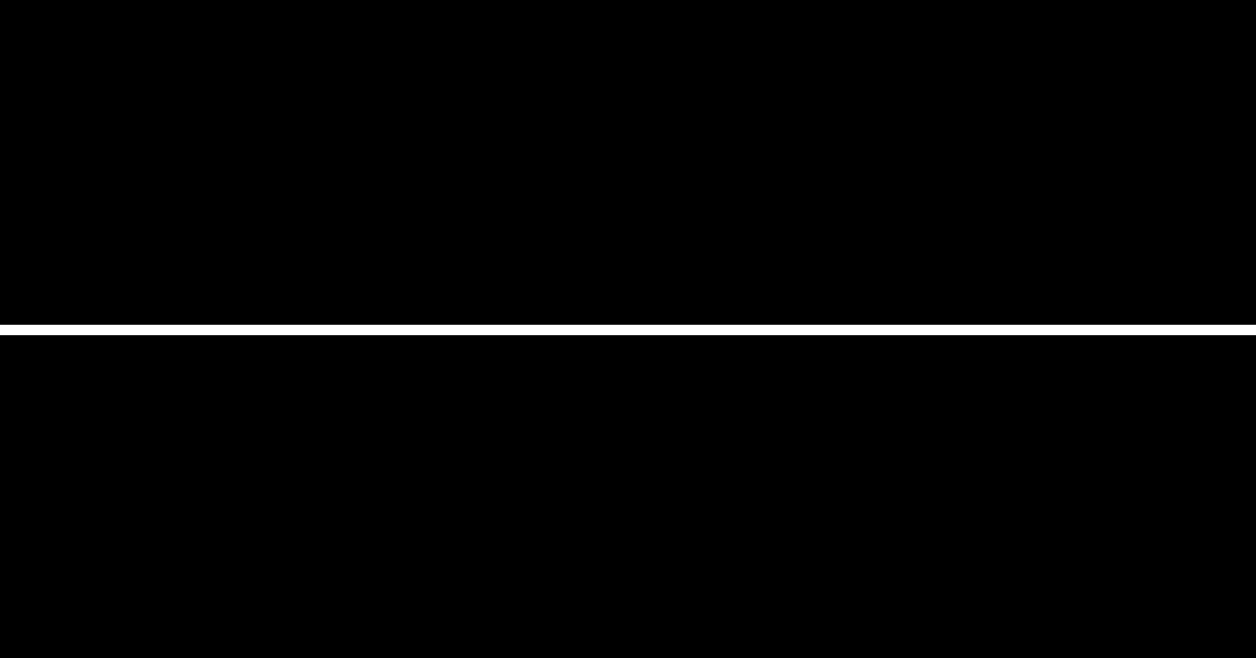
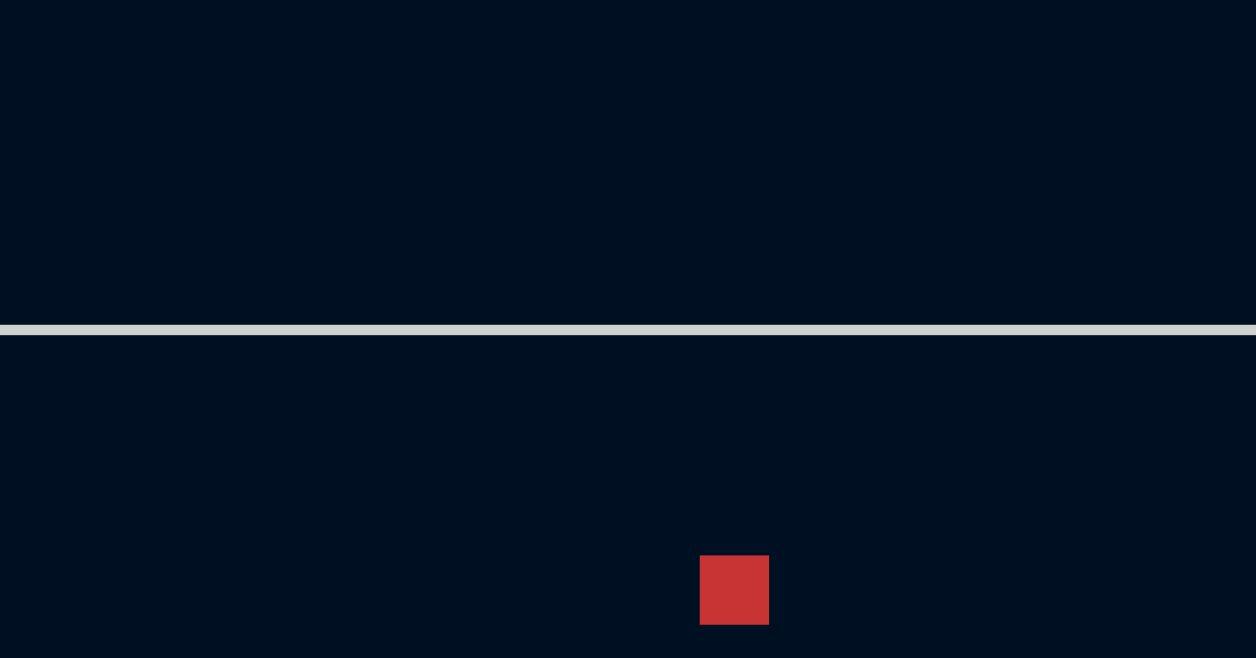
part: none -> (734, 590)

